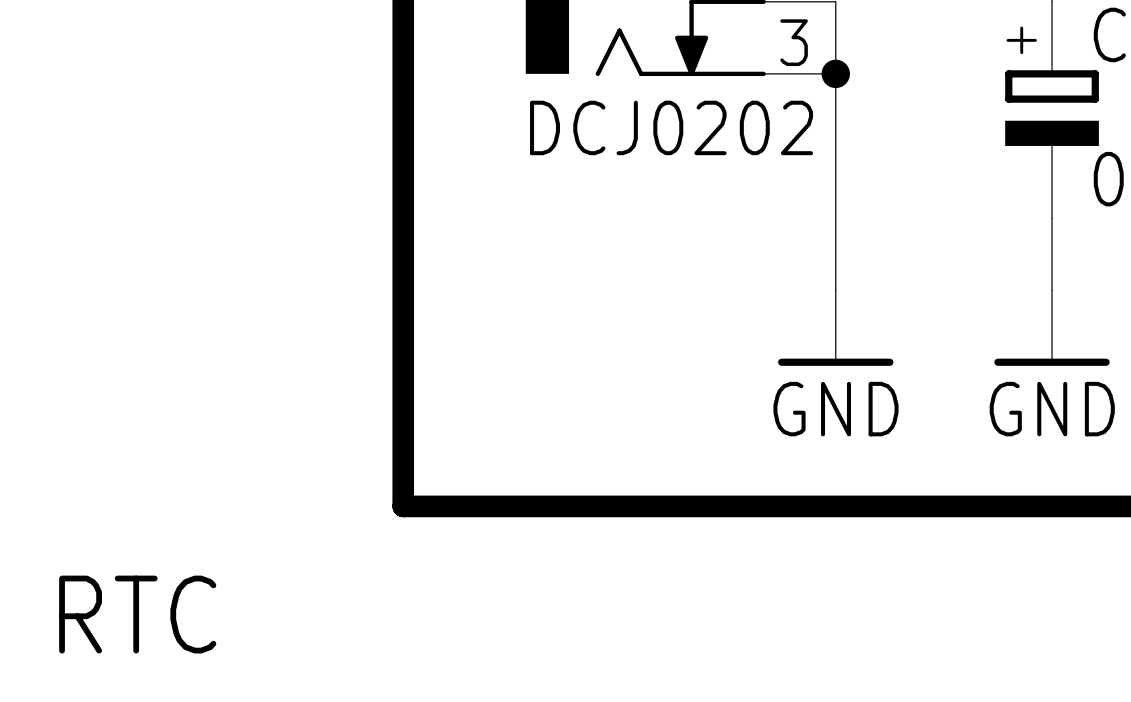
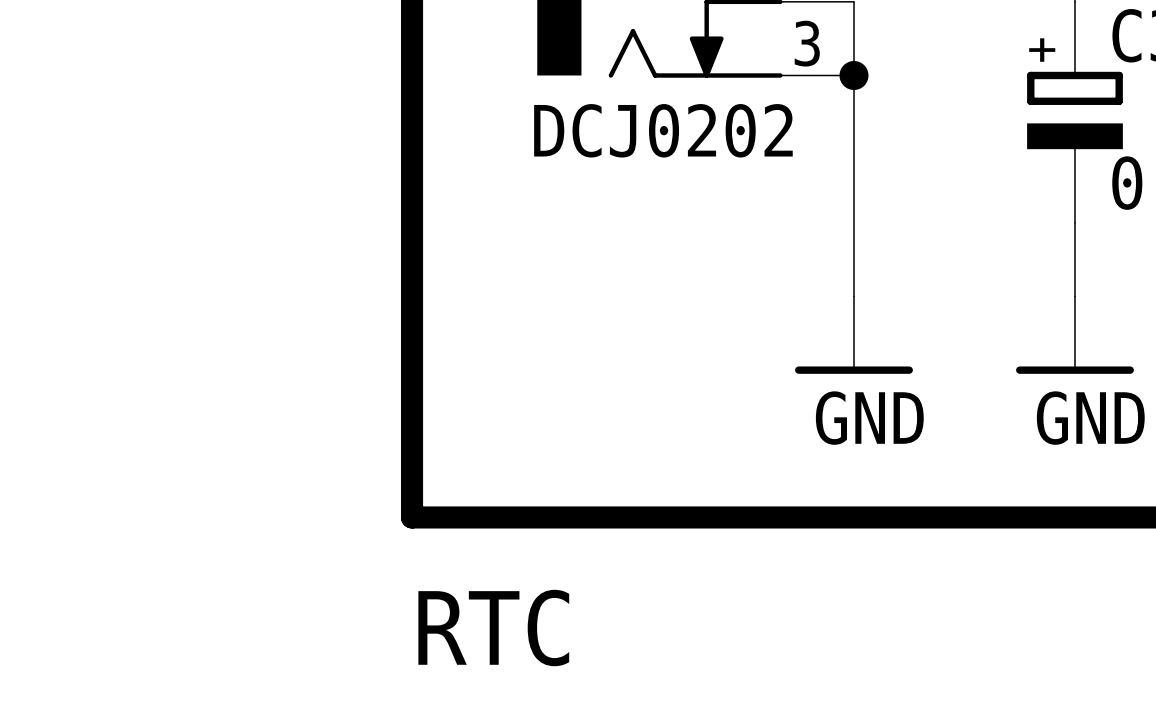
text position: RTC (137, 614) -> RTC (493, 628)

